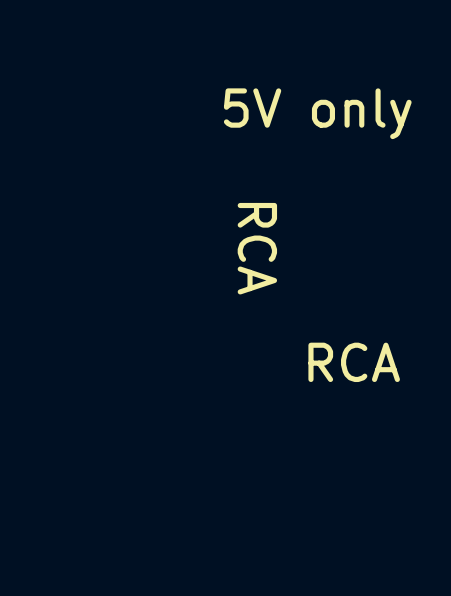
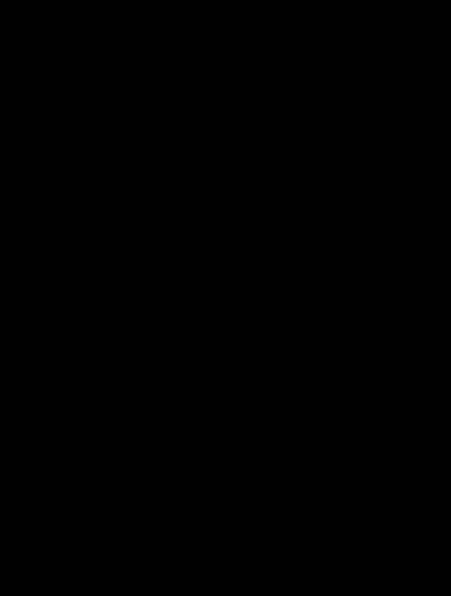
text: 5V only (317, 113) -> none
text: RCA (257, 248) -> none
text: RCA (354, 362) -> none

